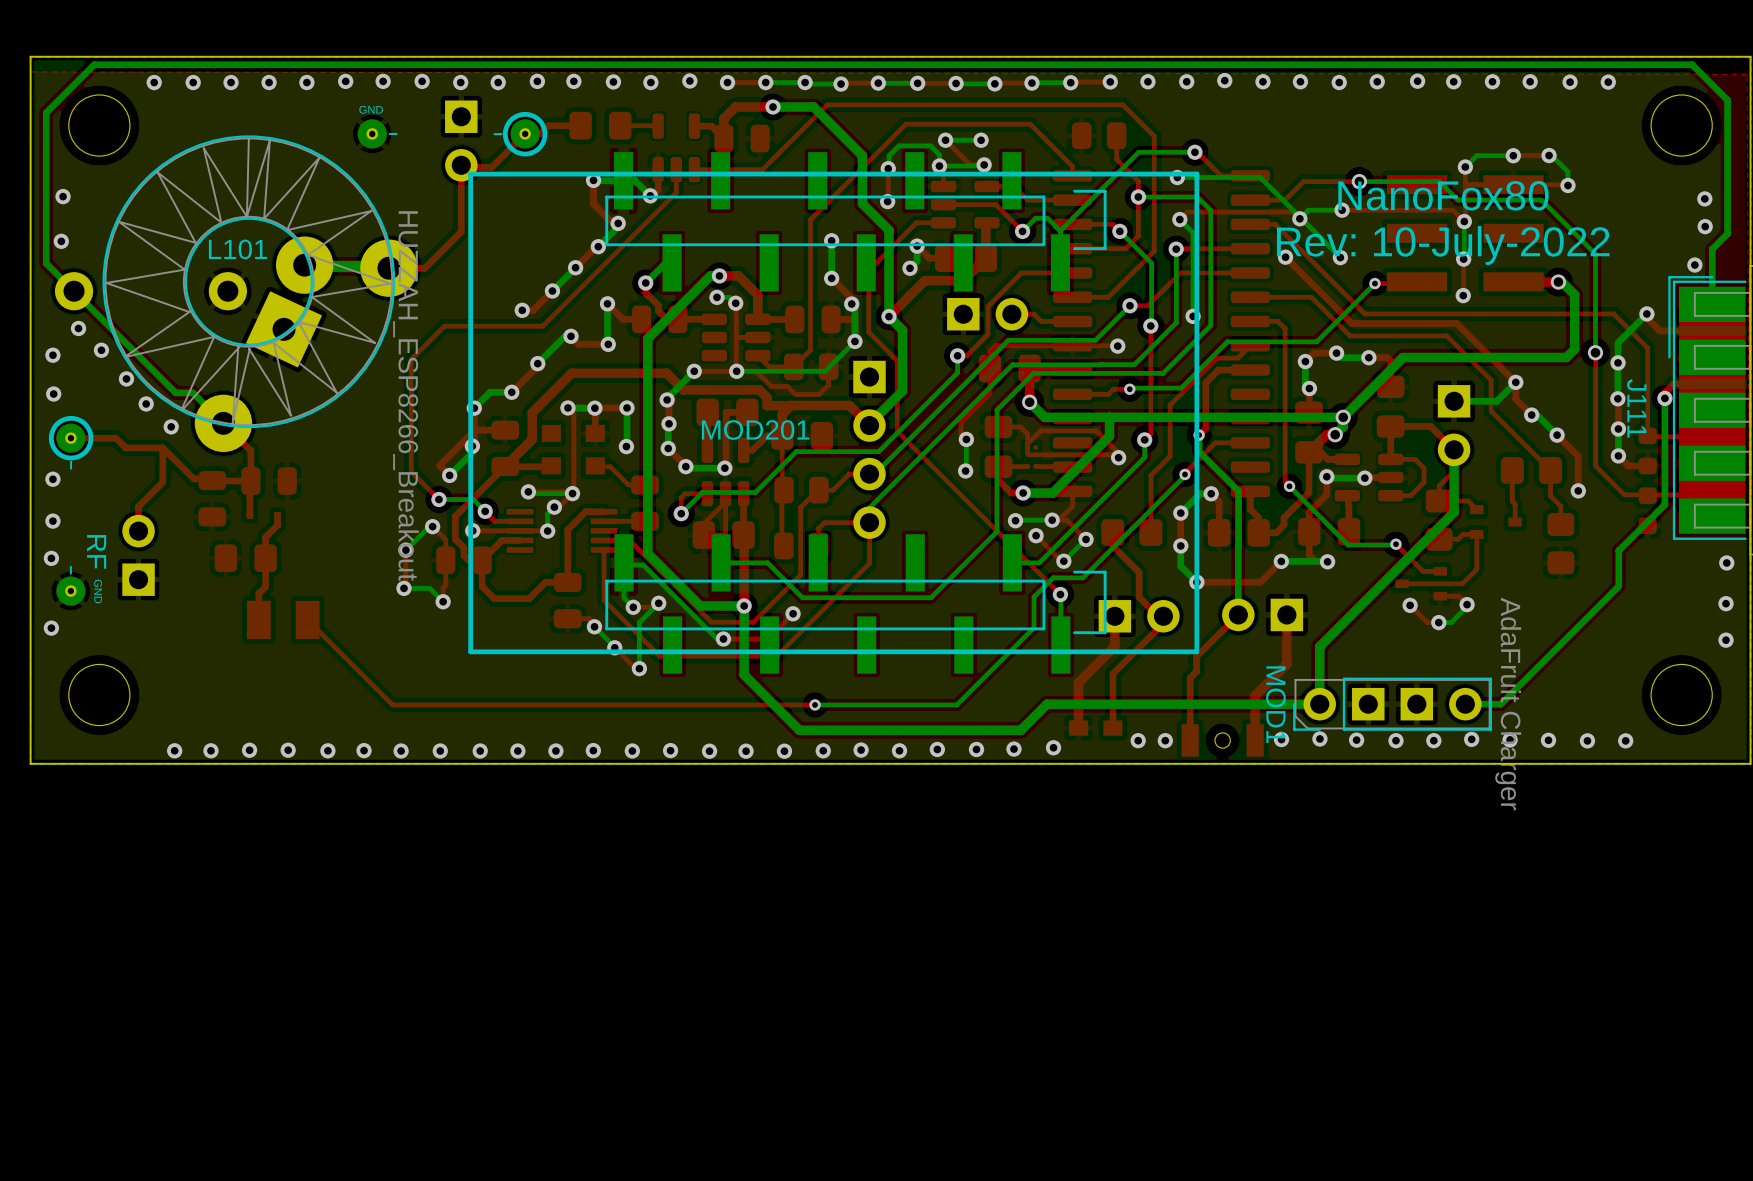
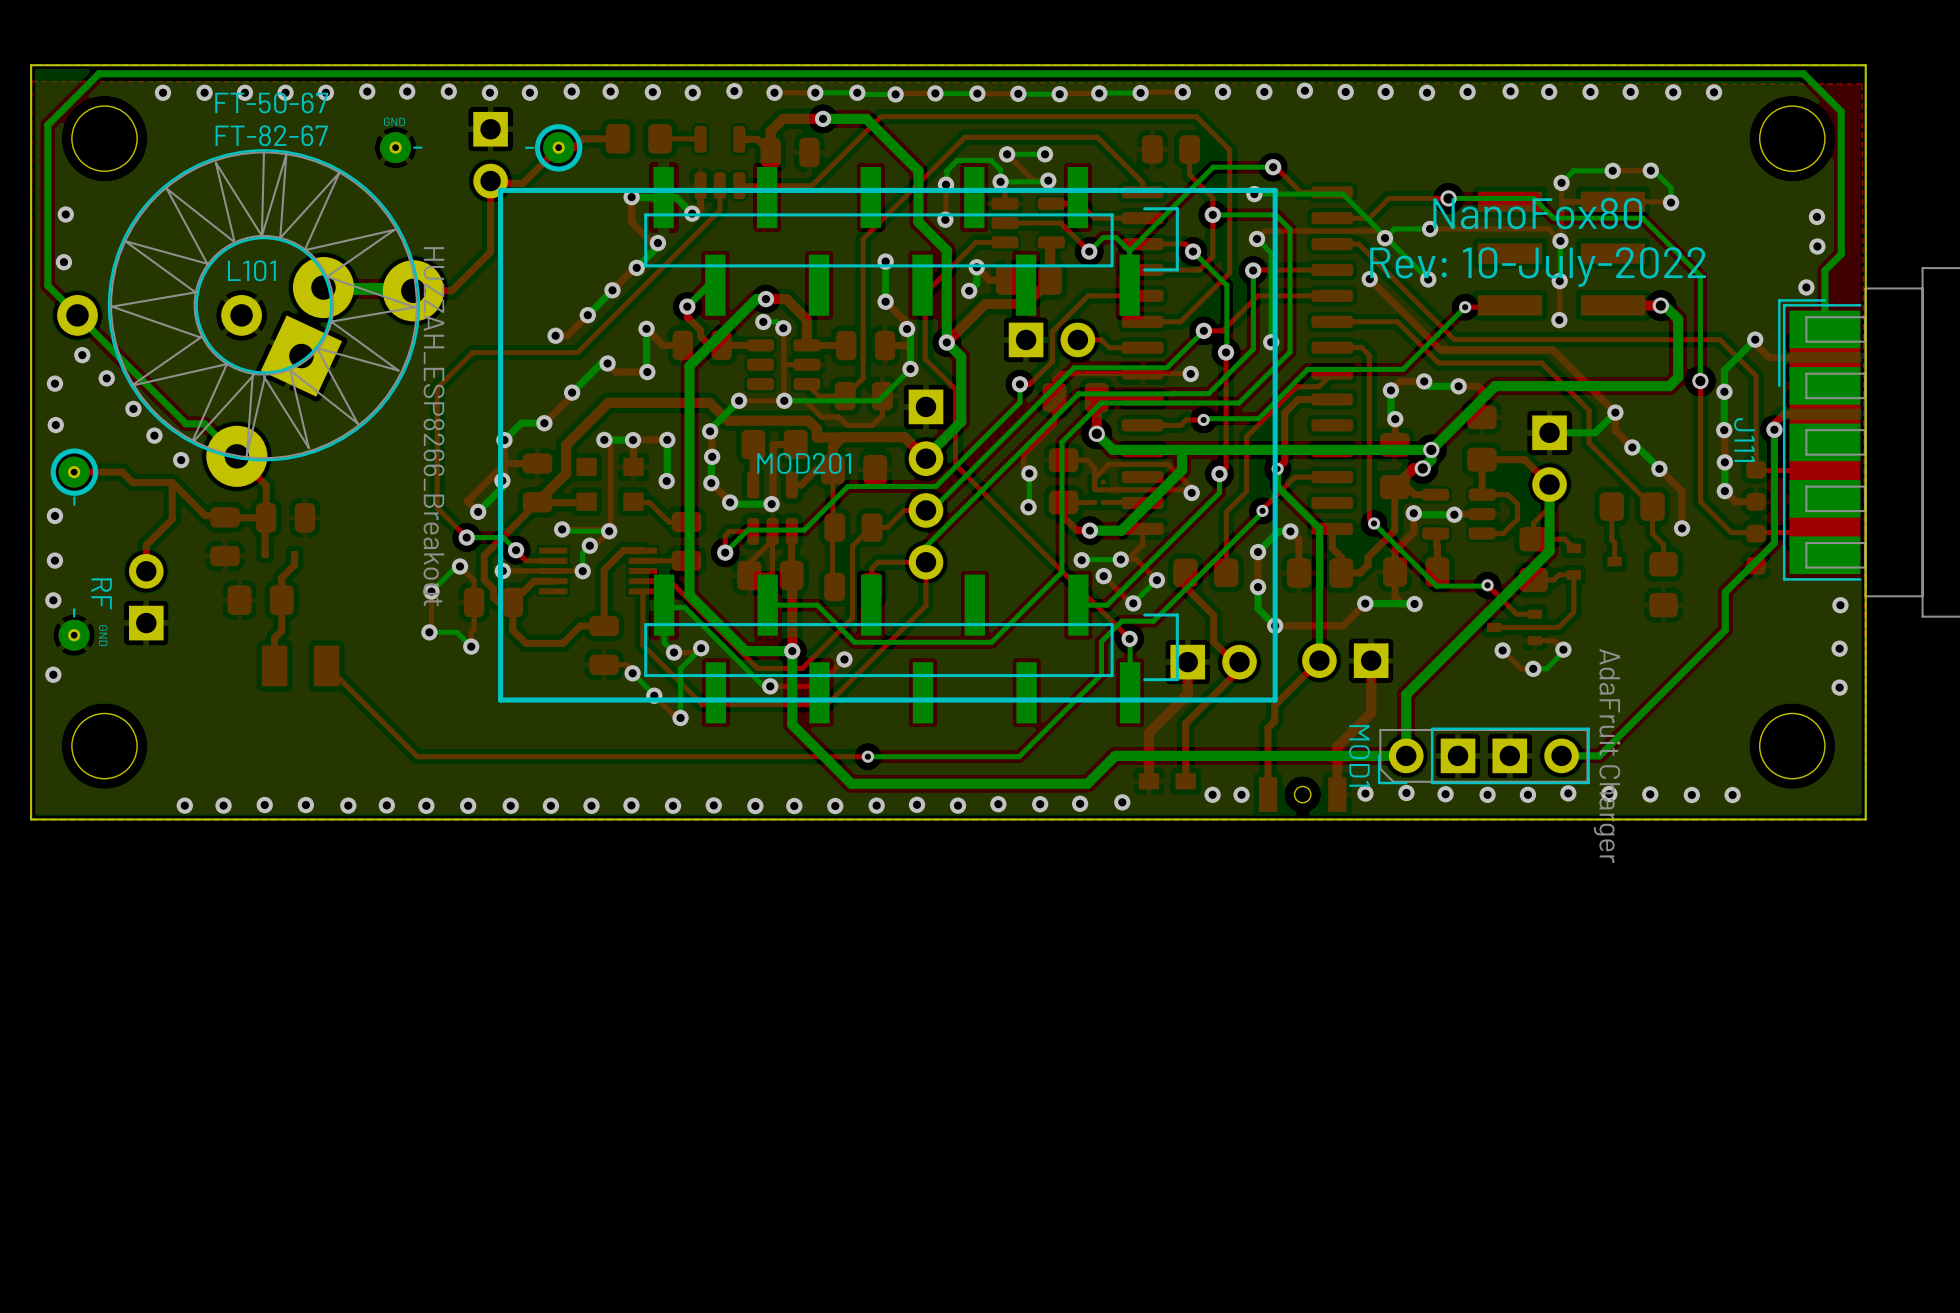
text: none -> FT-50-67 (271, 102)
text: none -> FT-82-67 (271, 135)

